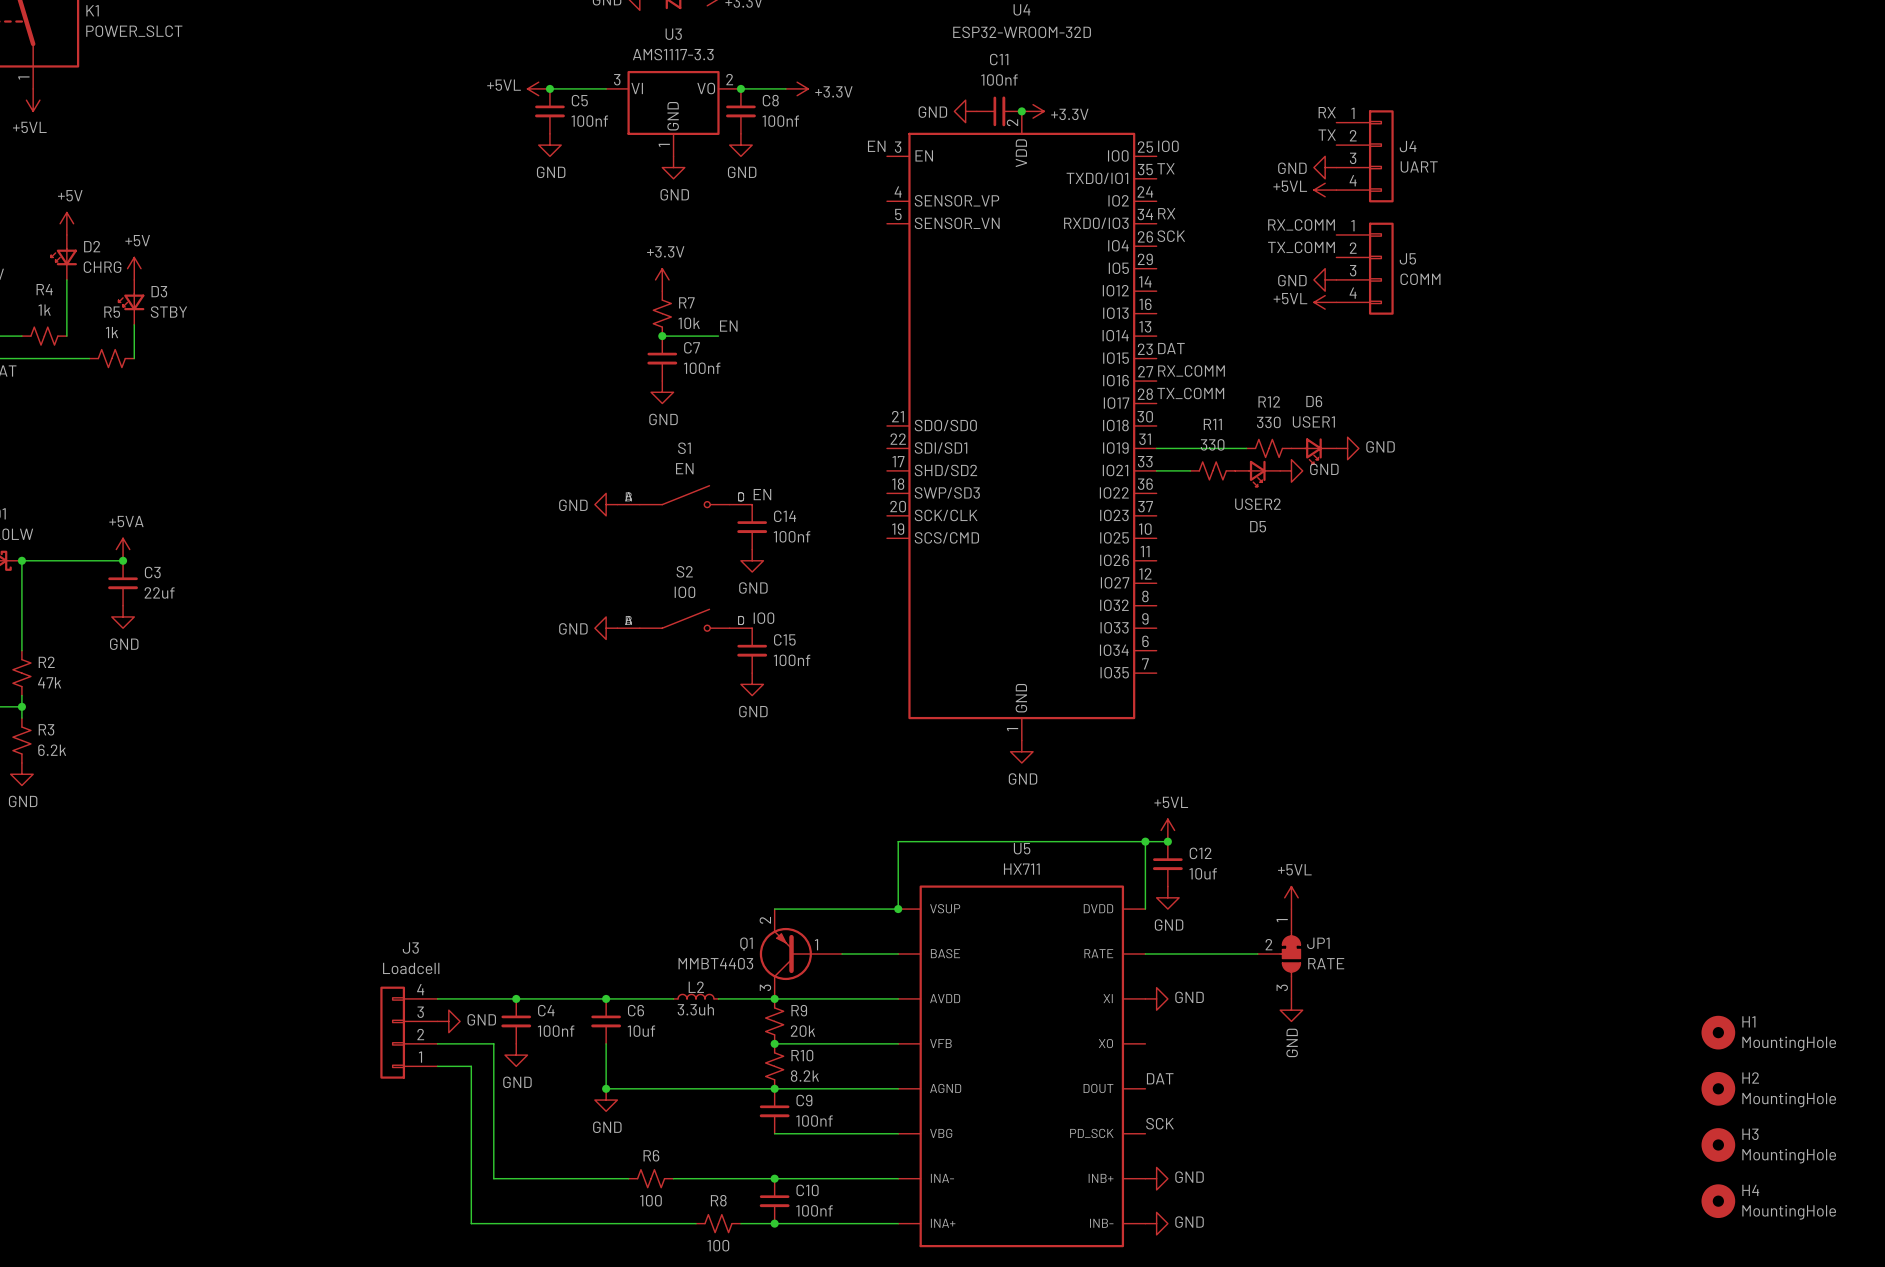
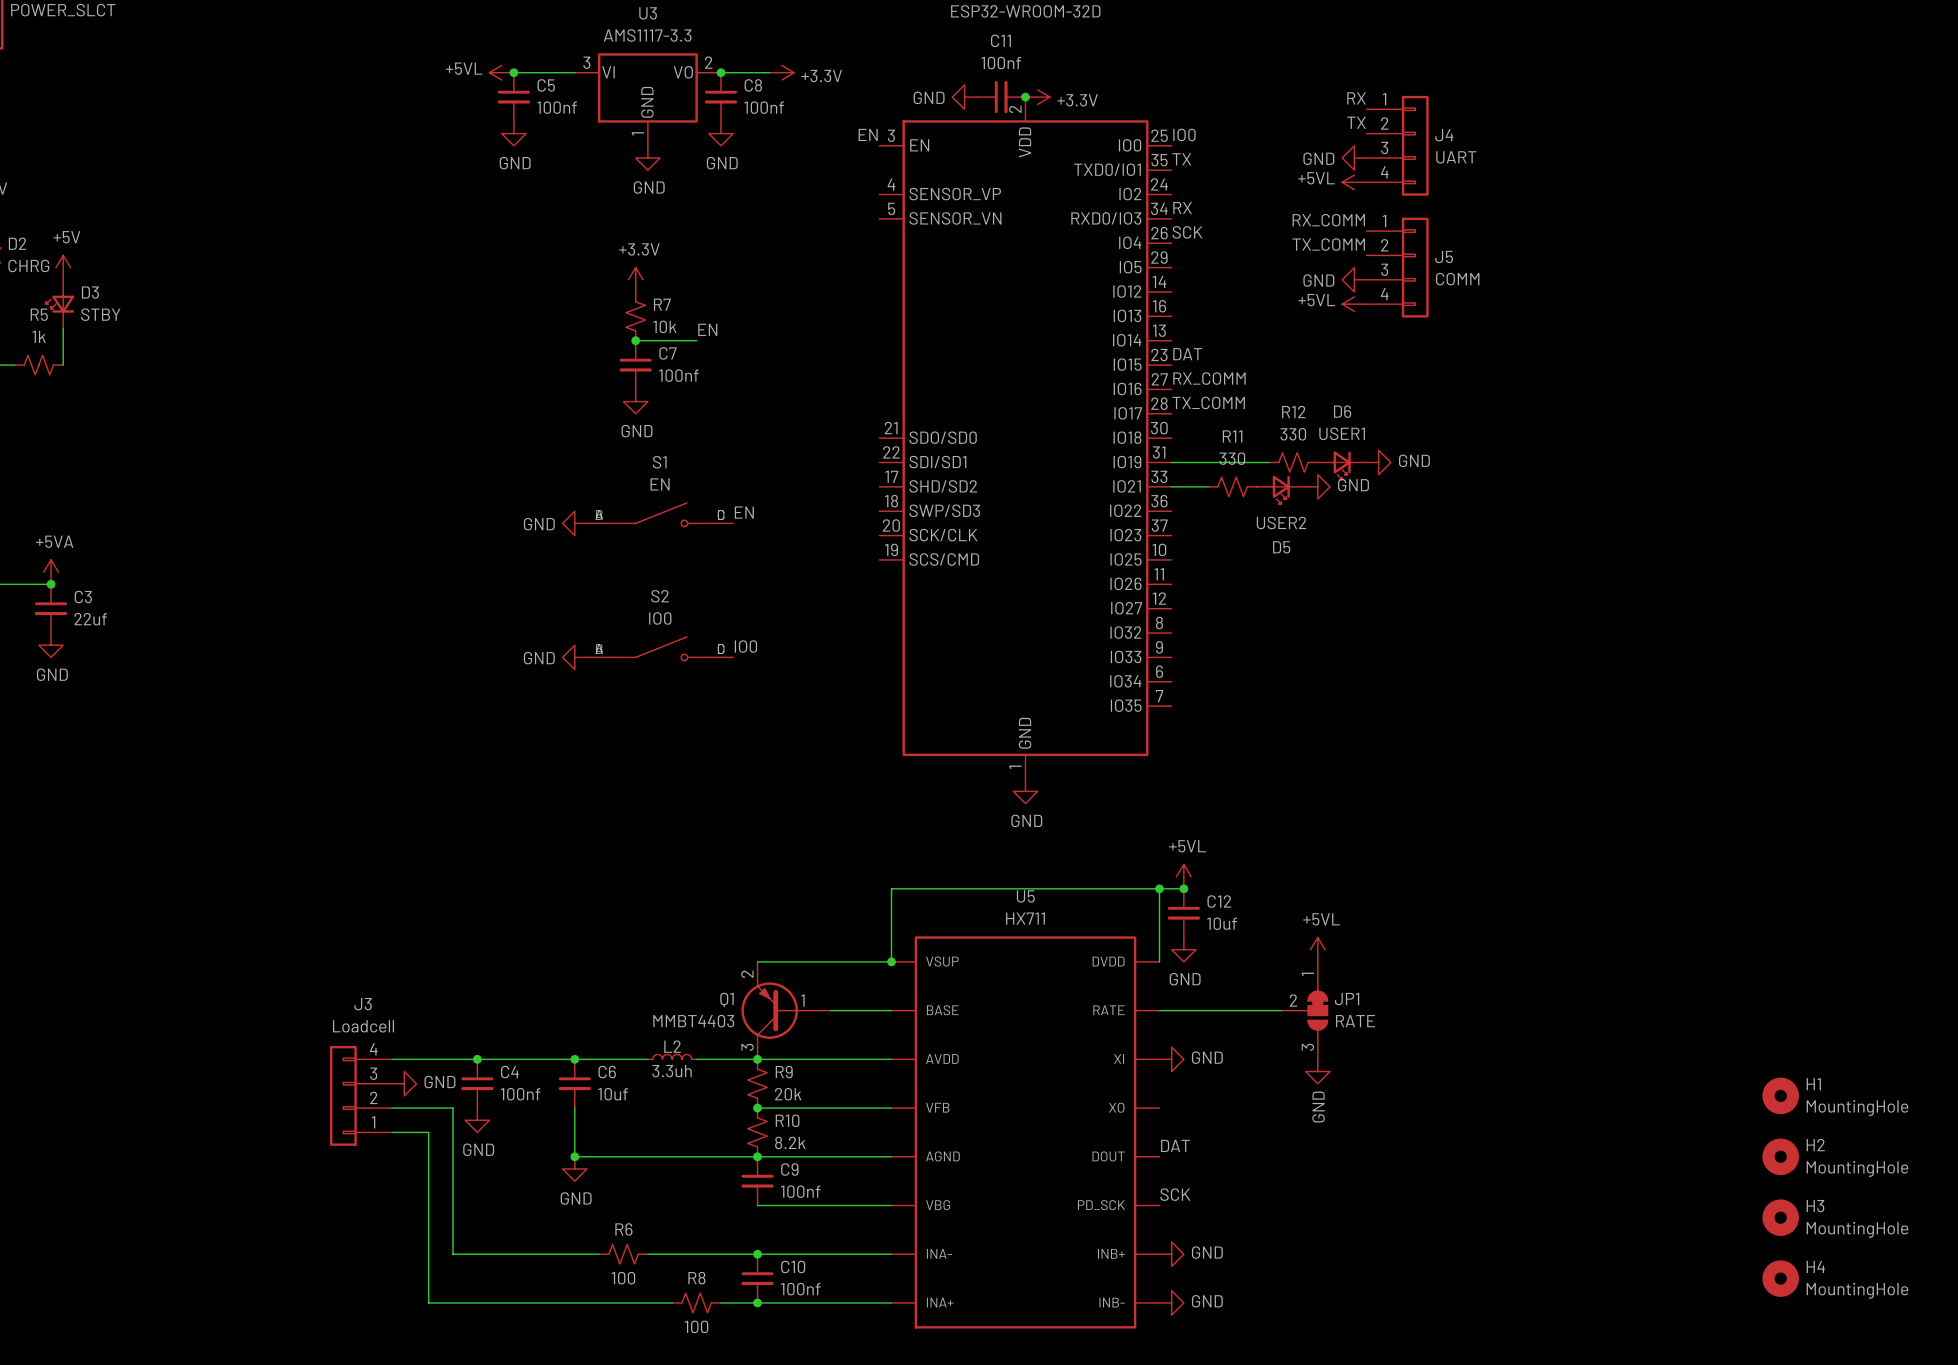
C14: 100nf (752, 527) -> none
power symbol: GND (752, 560) -> none
C15: 100nf (752, 650) -> none
power symbol: GND (752, 684) -> none

